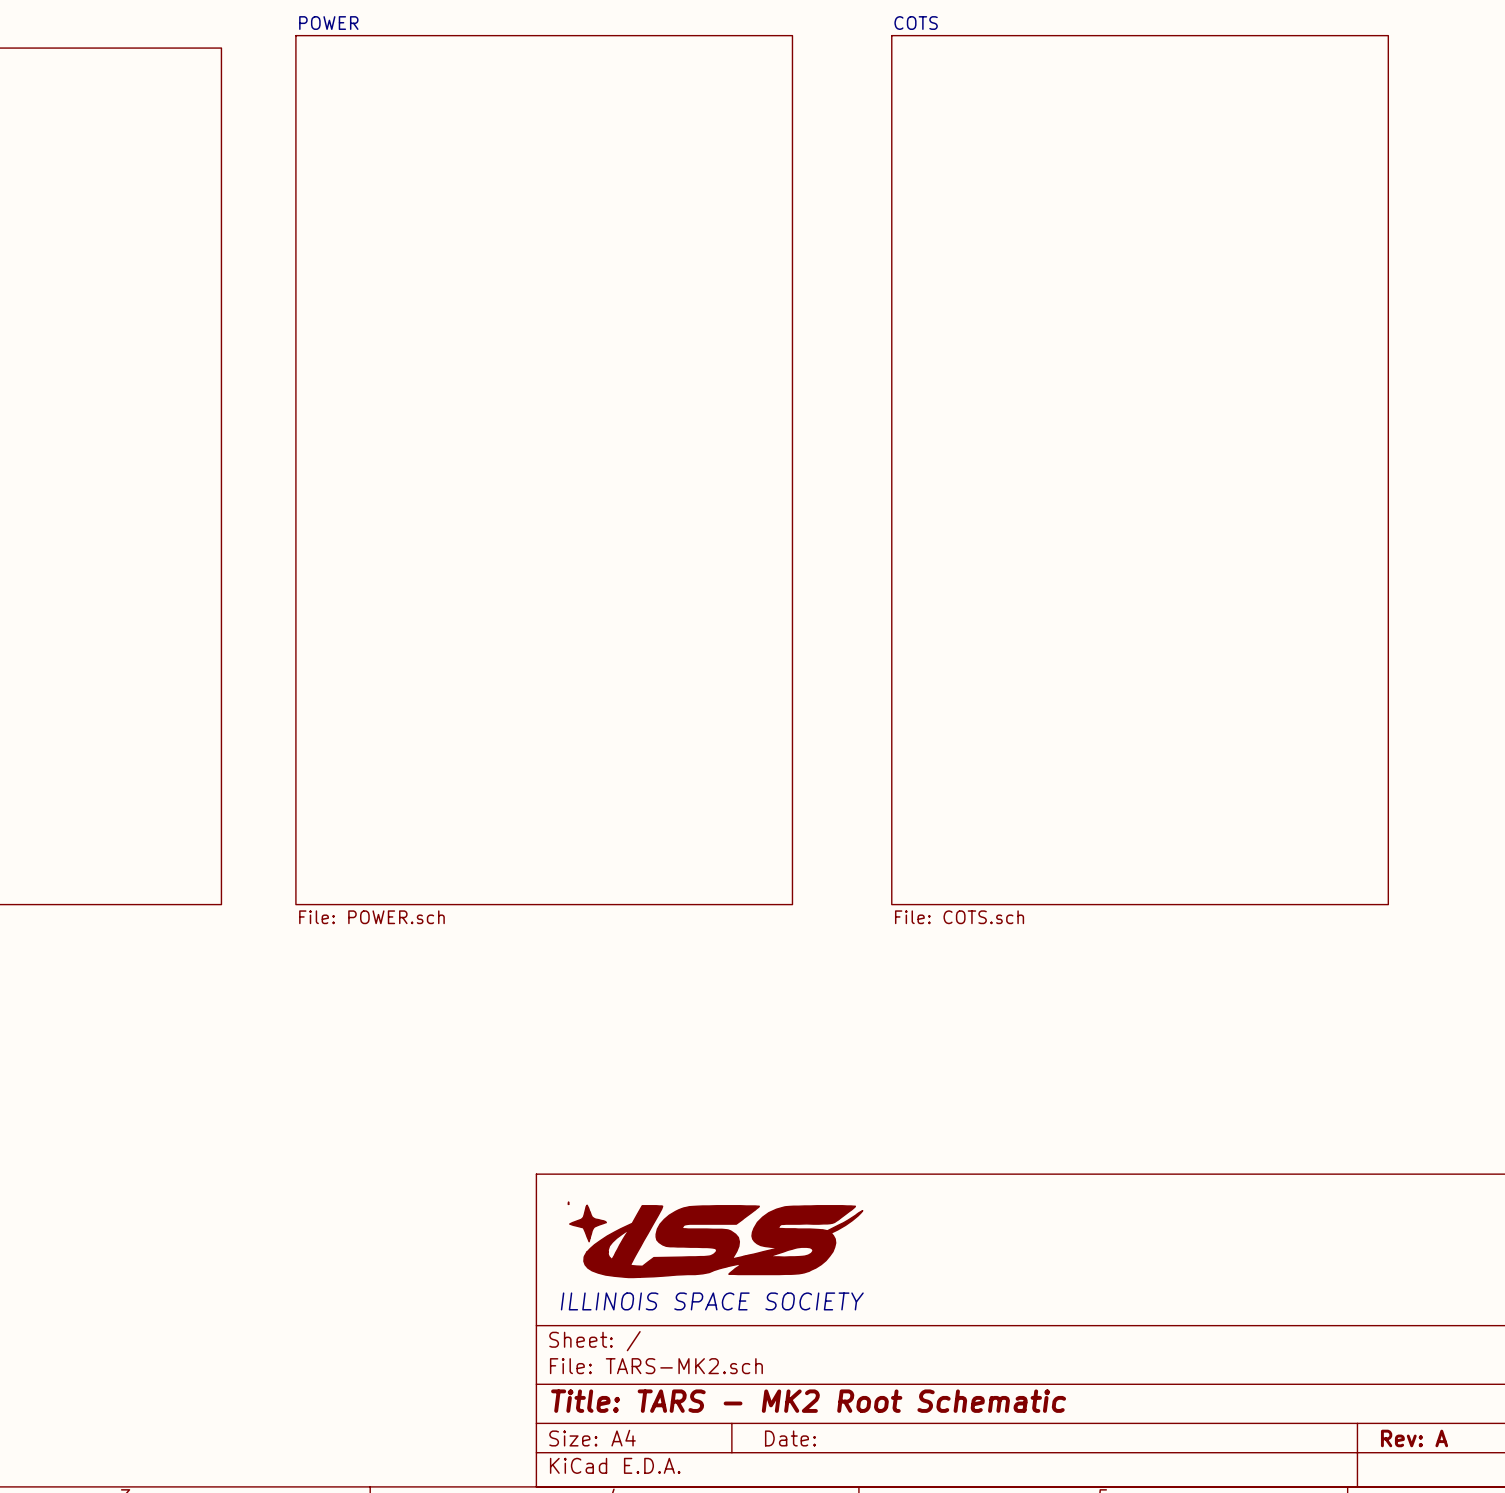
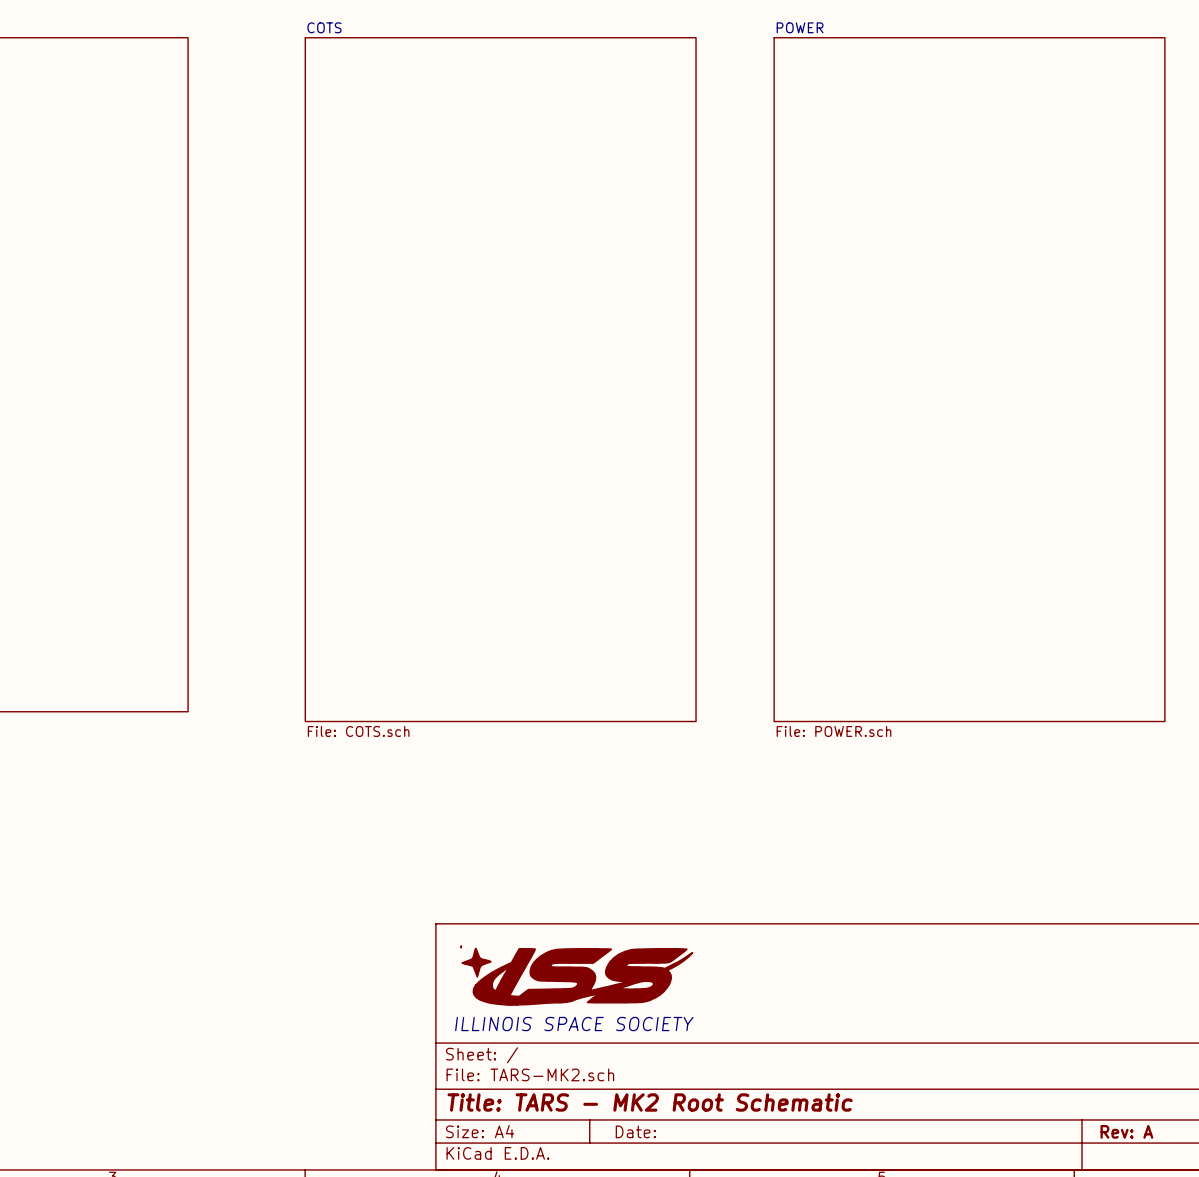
sheet POWER: File: POWER.sch (544, 470) -> none
sheet COTS: File: COTS.sch (1140, 470) -> none
sheet COTS: none -> File: COTS.sch (500, 379)
sheet POWER: none -> File: POWER.sch (969, 379)

